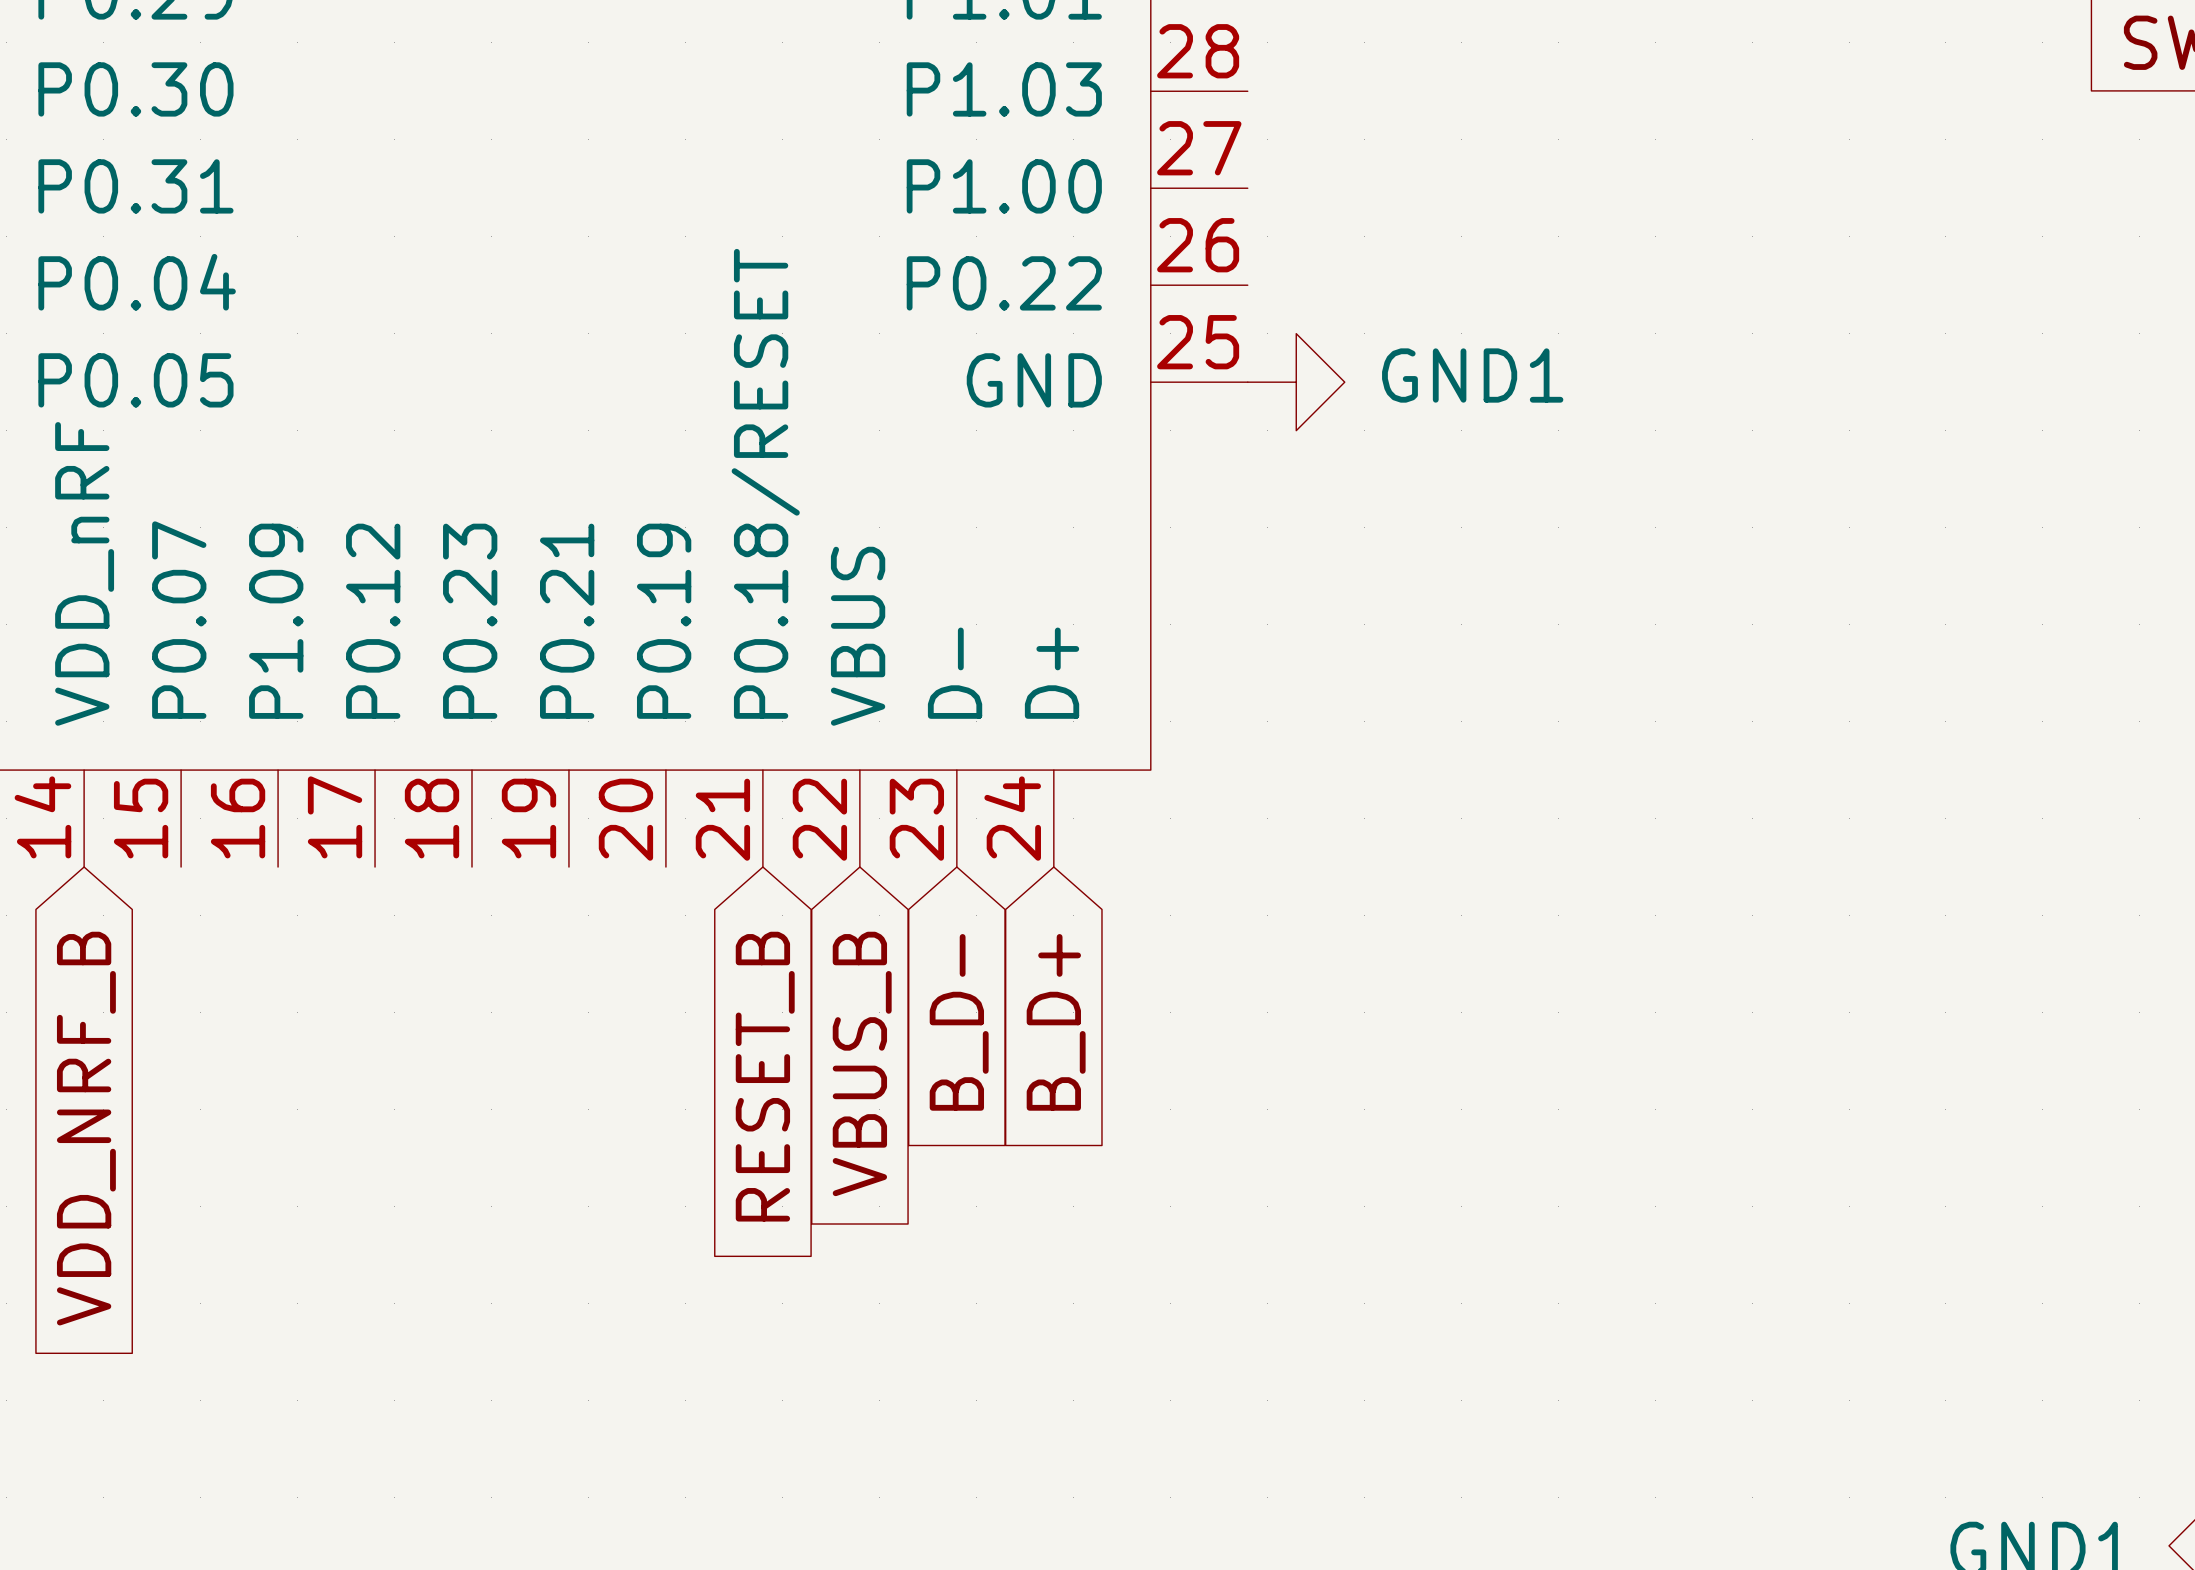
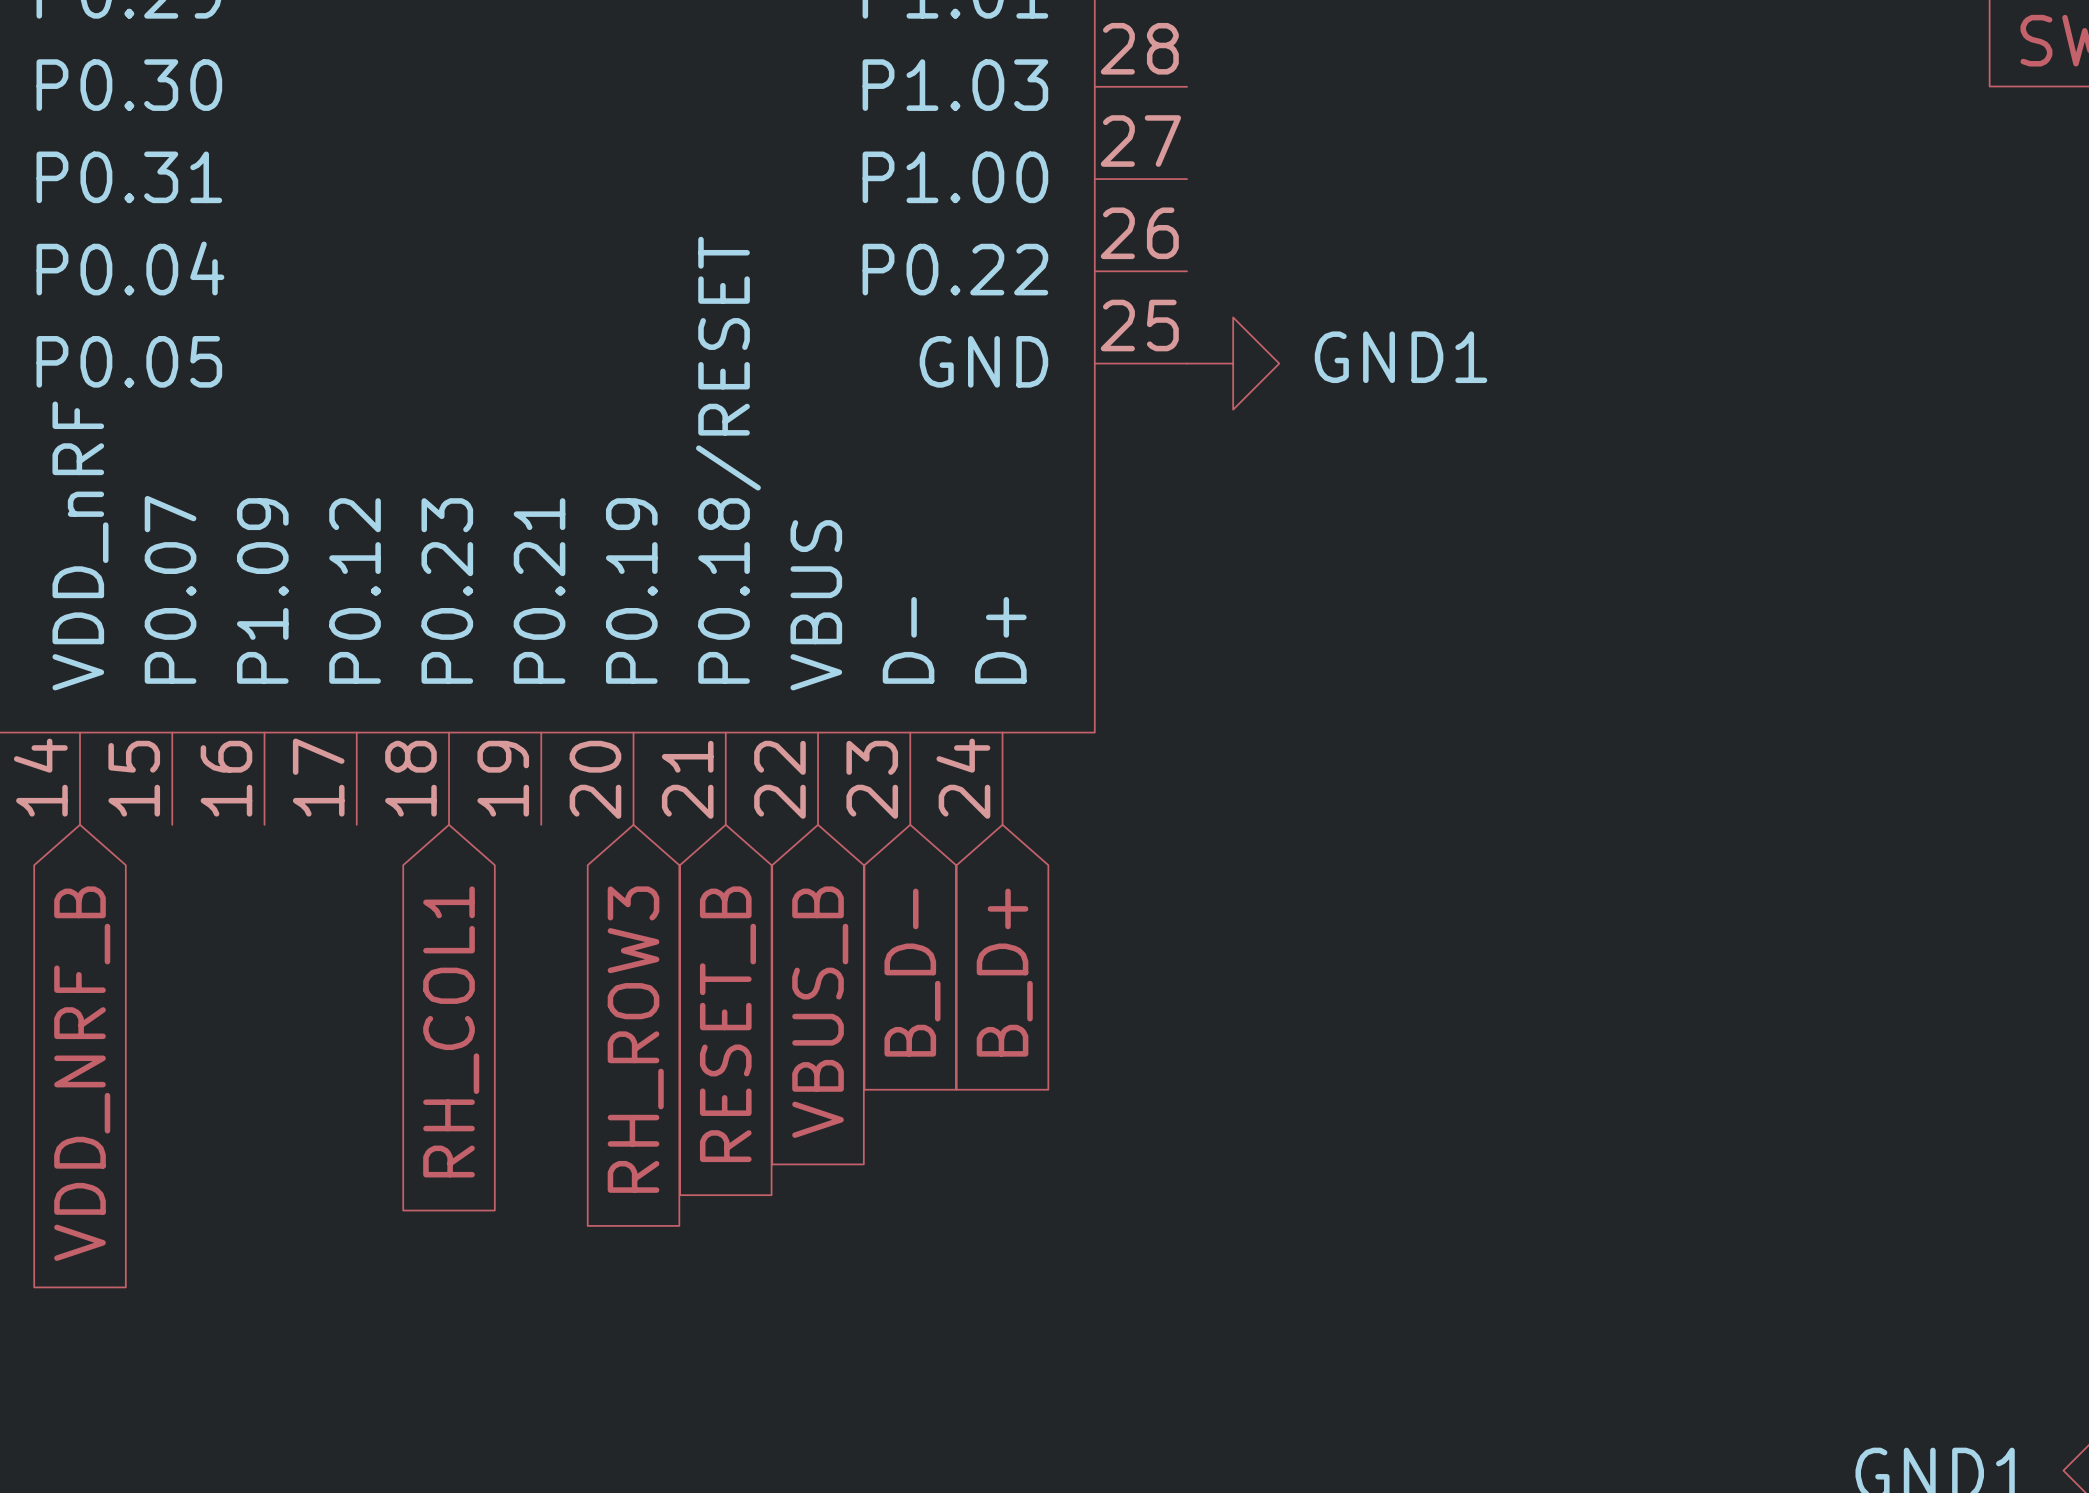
global label: none -> RH_COL1 (451, 1031)
global label: none -> RH_ROW3 (635, 1039)

